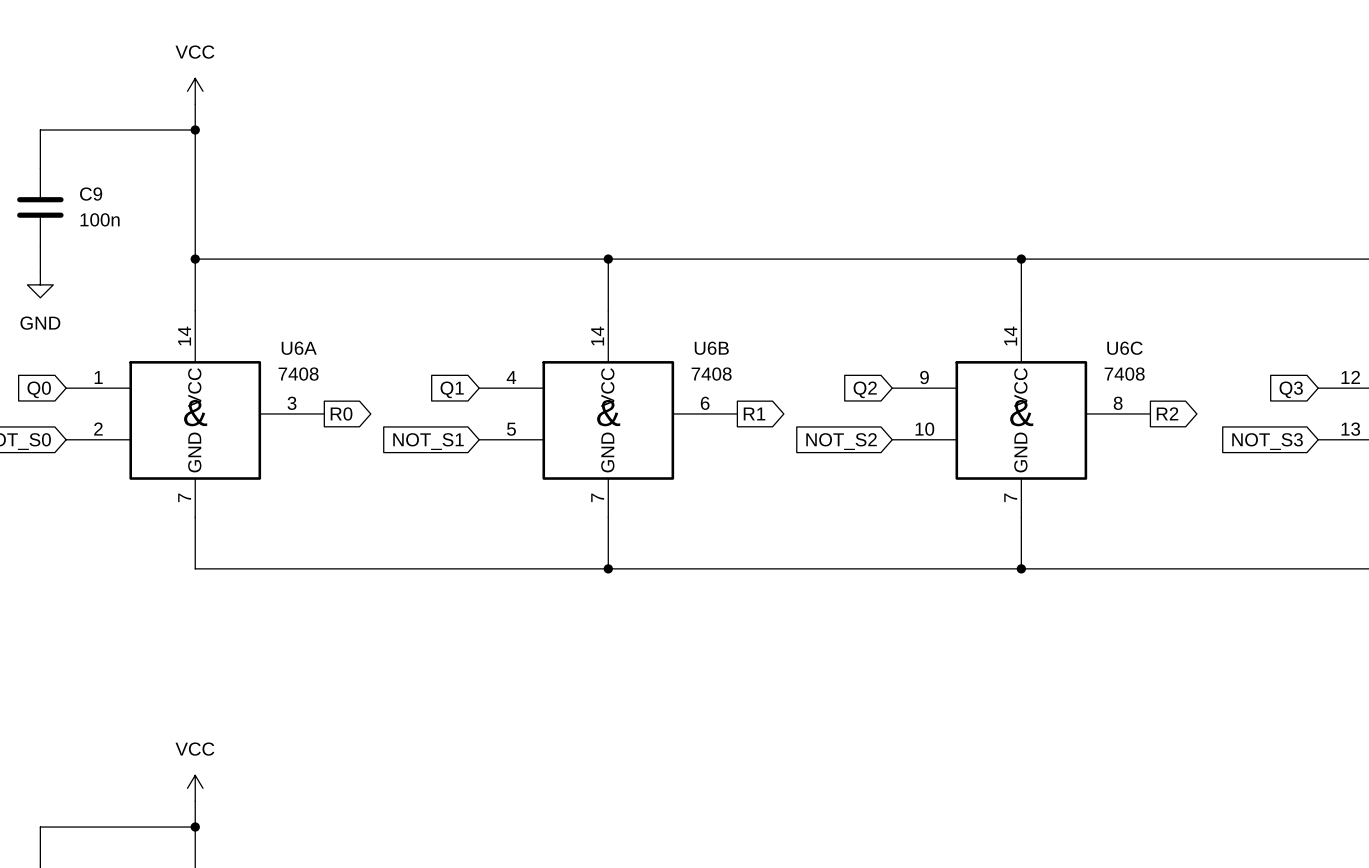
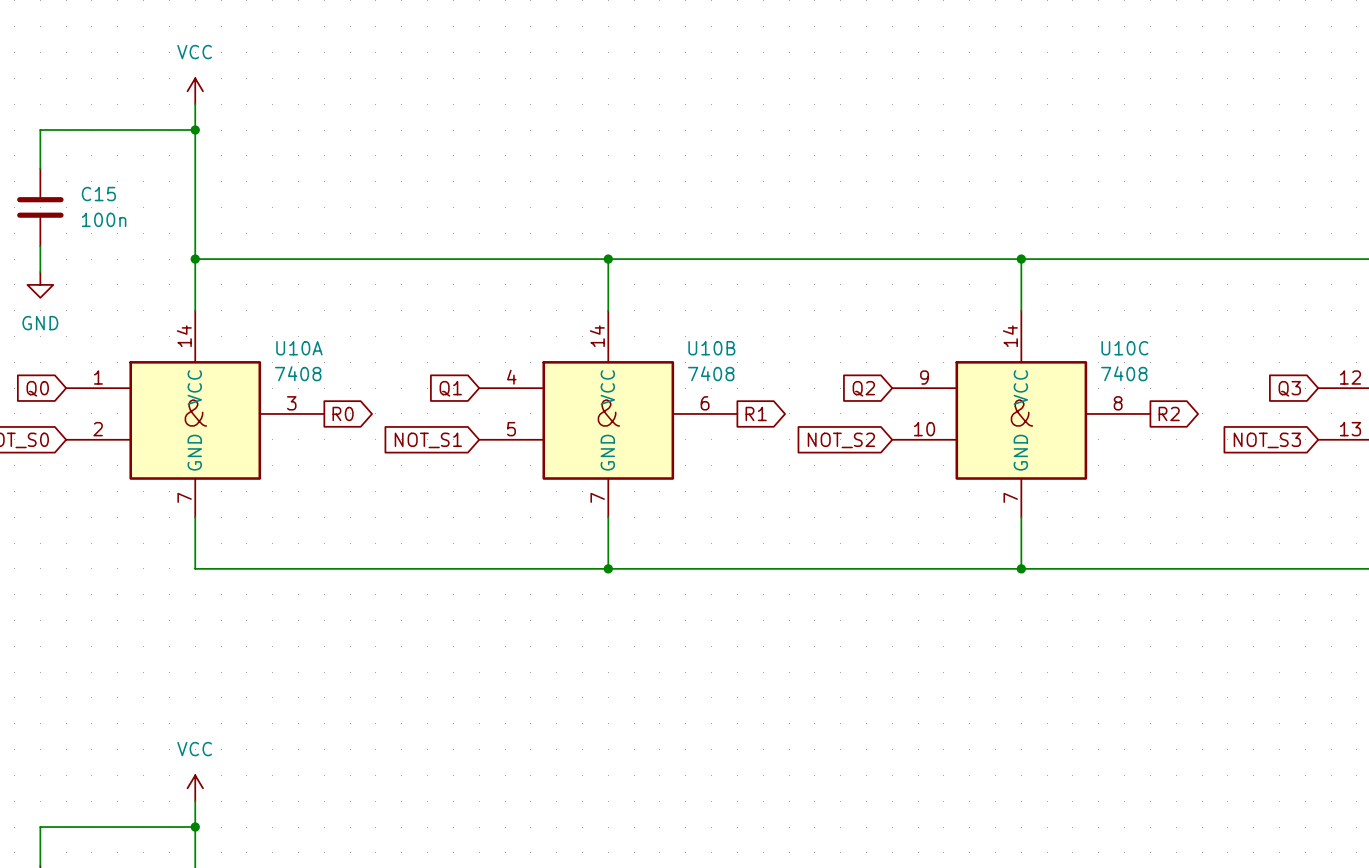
C9 name: C9 (91, 194) -> C15 (98, 194)
U6A name: U6A (299, 348) -> U10A (299, 348)
U6B name: U6B (711, 348) -> U10B (711, 348)
U6C name: U6C (1124, 348) -> U10C (1124, 348)

